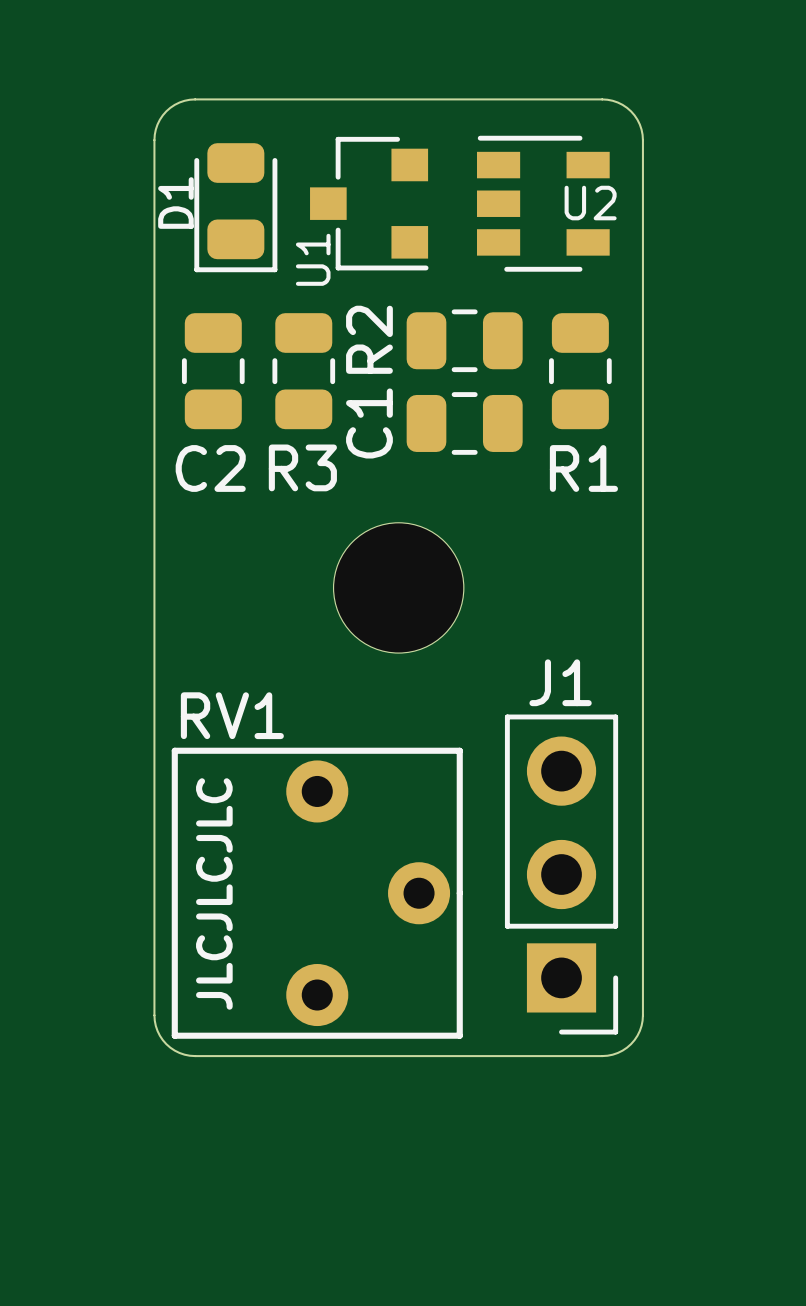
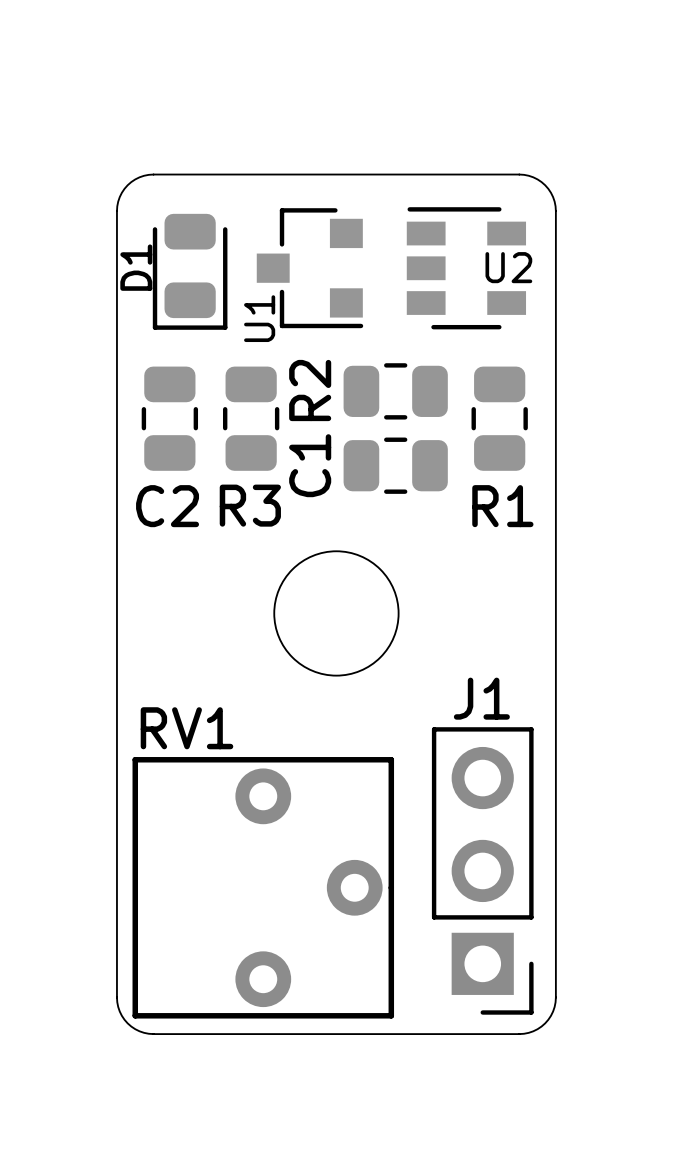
round board edge: none -> [273, 550, 400, 677]
part: (398, 587) -> none
text: JLCJLCJLC (214, 893) -> none

